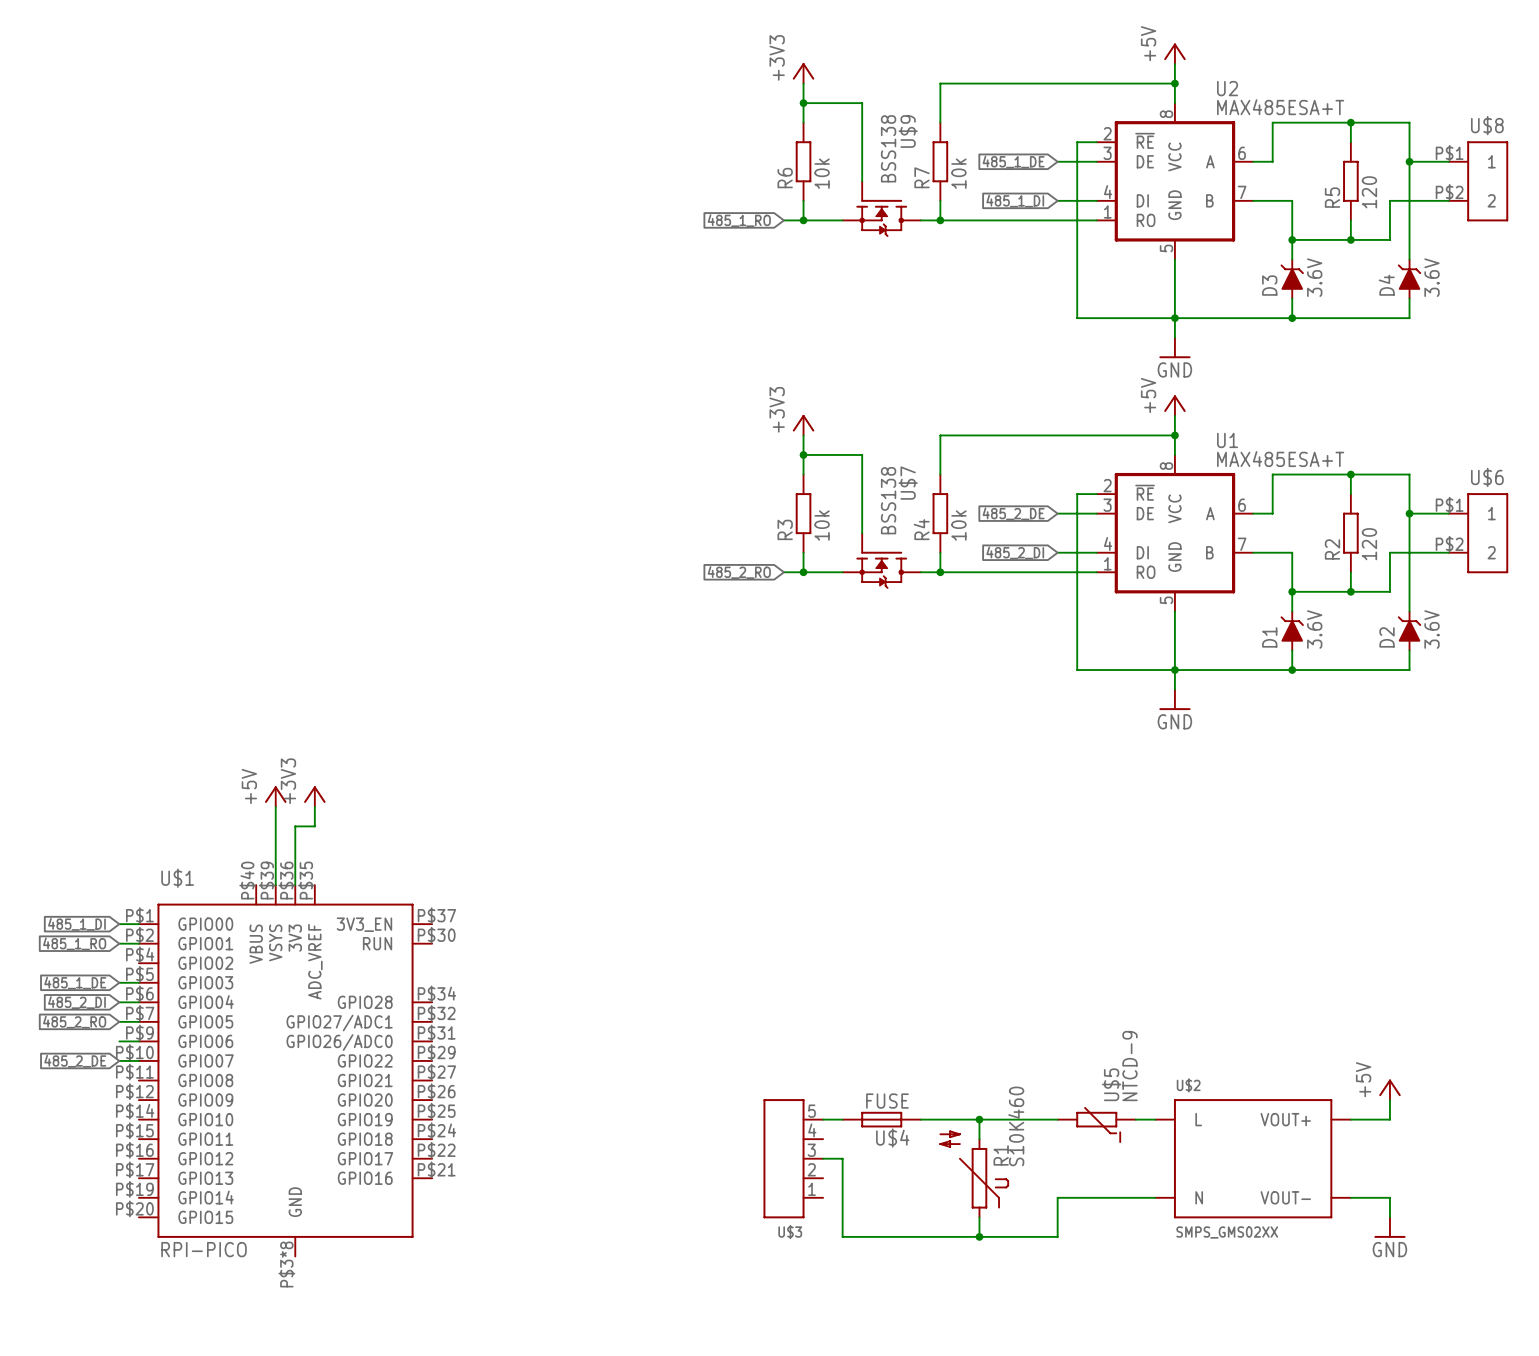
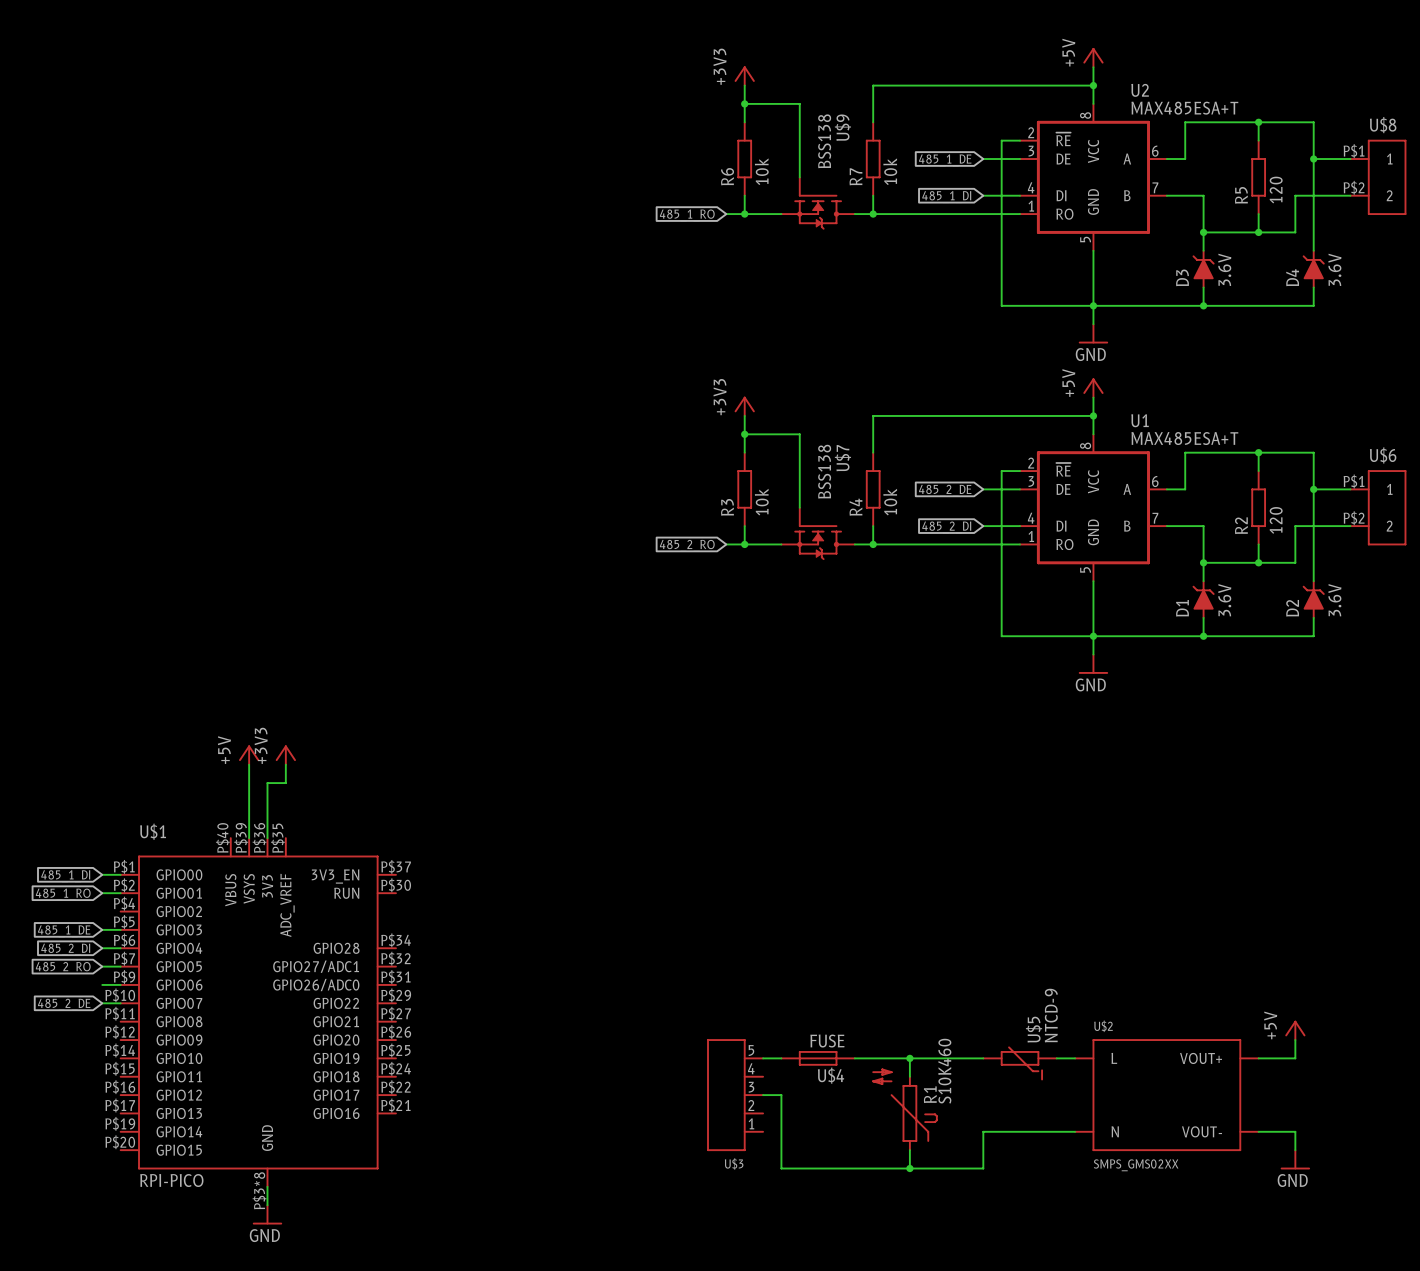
wire: none -> (267, 1186) (267, 1205)
power symbol: none -> GND (267, 1214)

